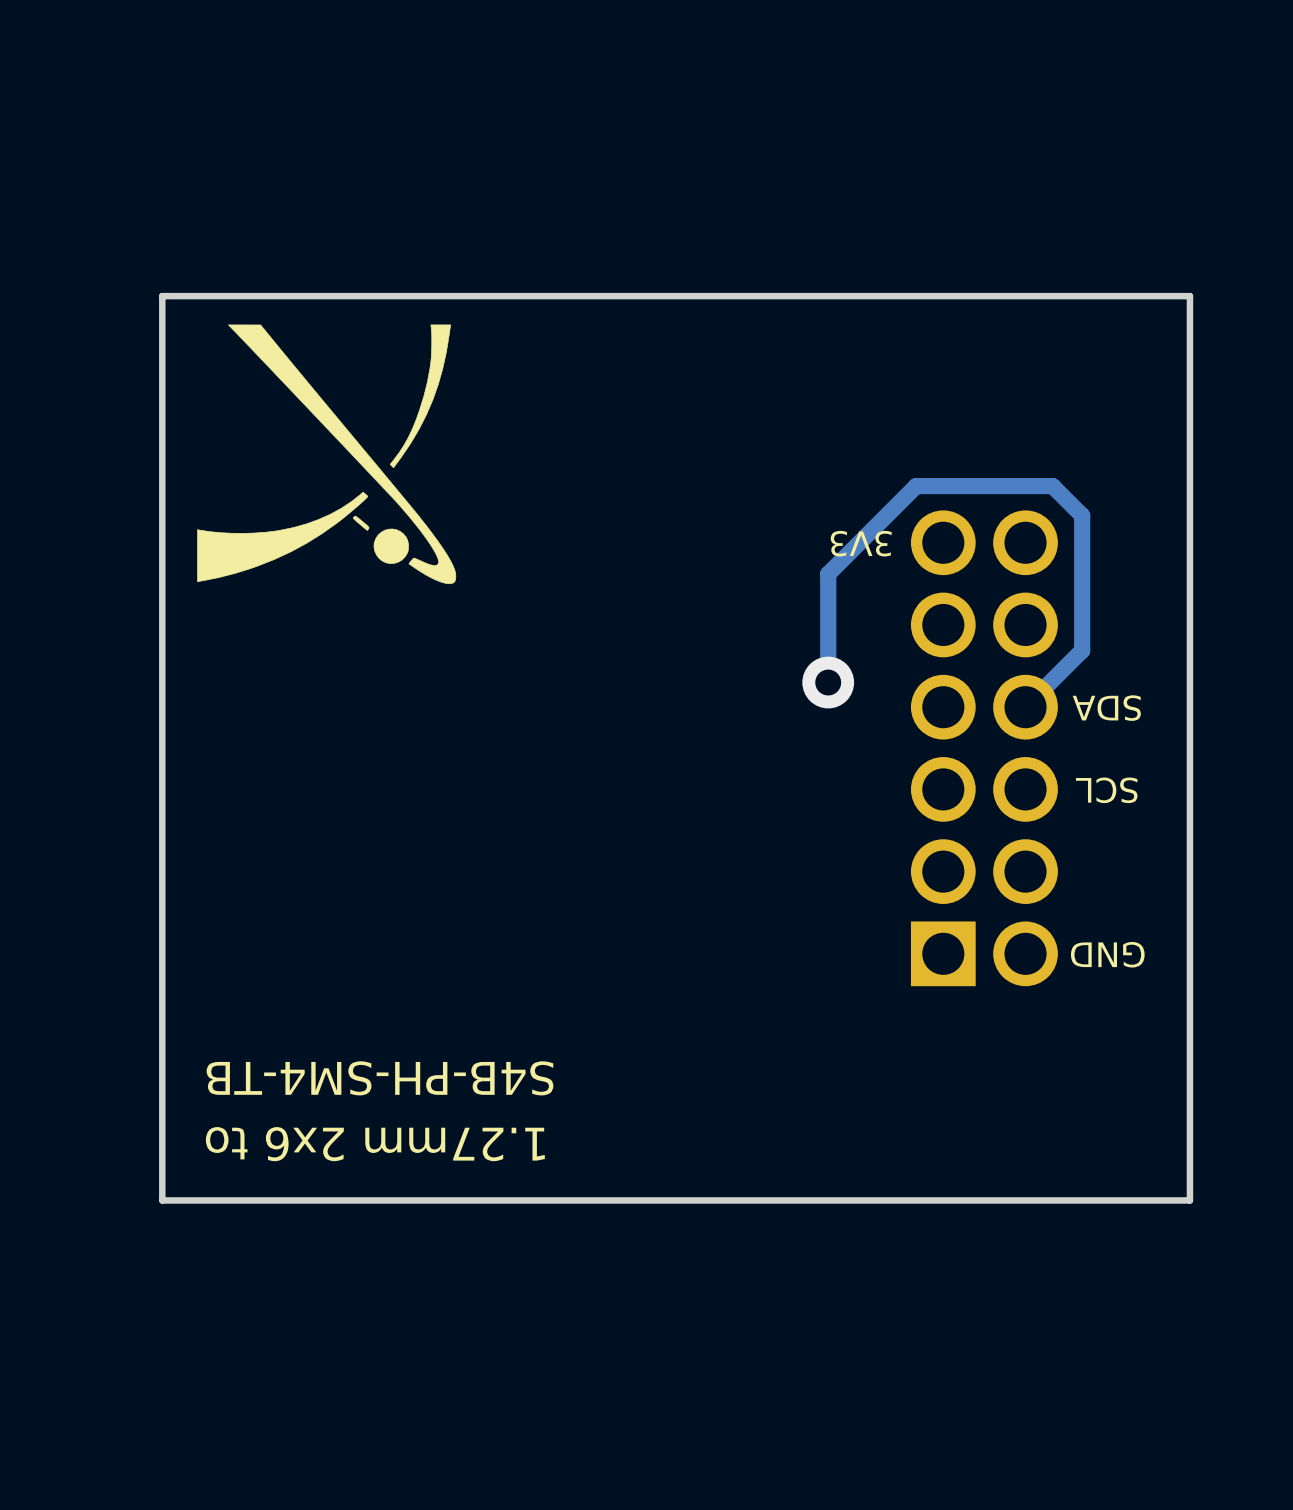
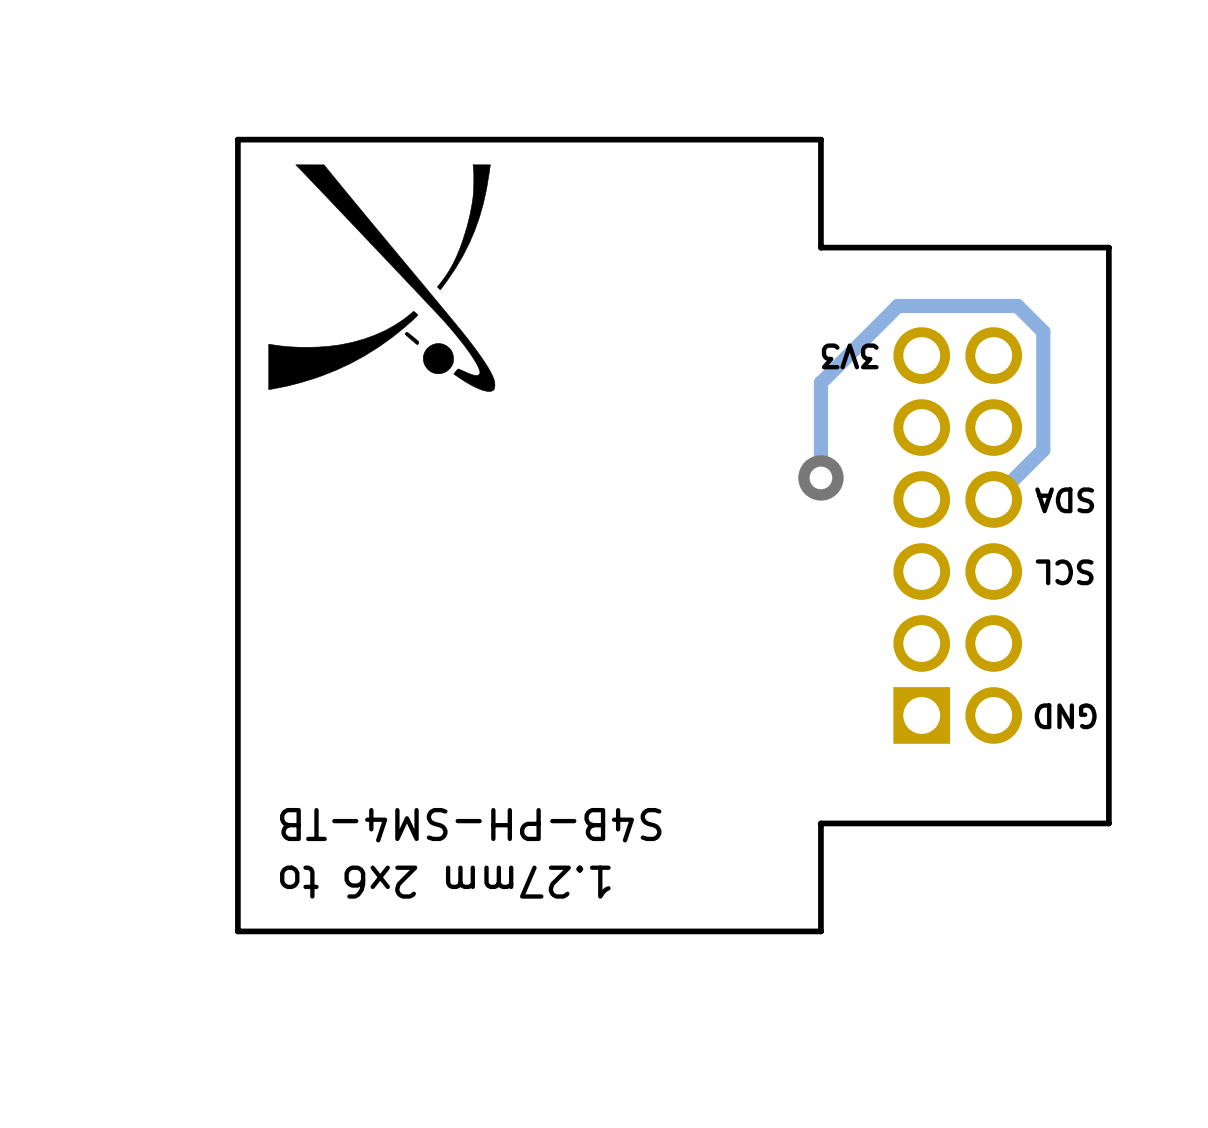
board edge: (828, 296) (1189, 296) (1189, 1200) (828, 1200) -> (820, 139) (820, 247) (1108, 247) (1108, 823) (820, 823) (820, 931)

